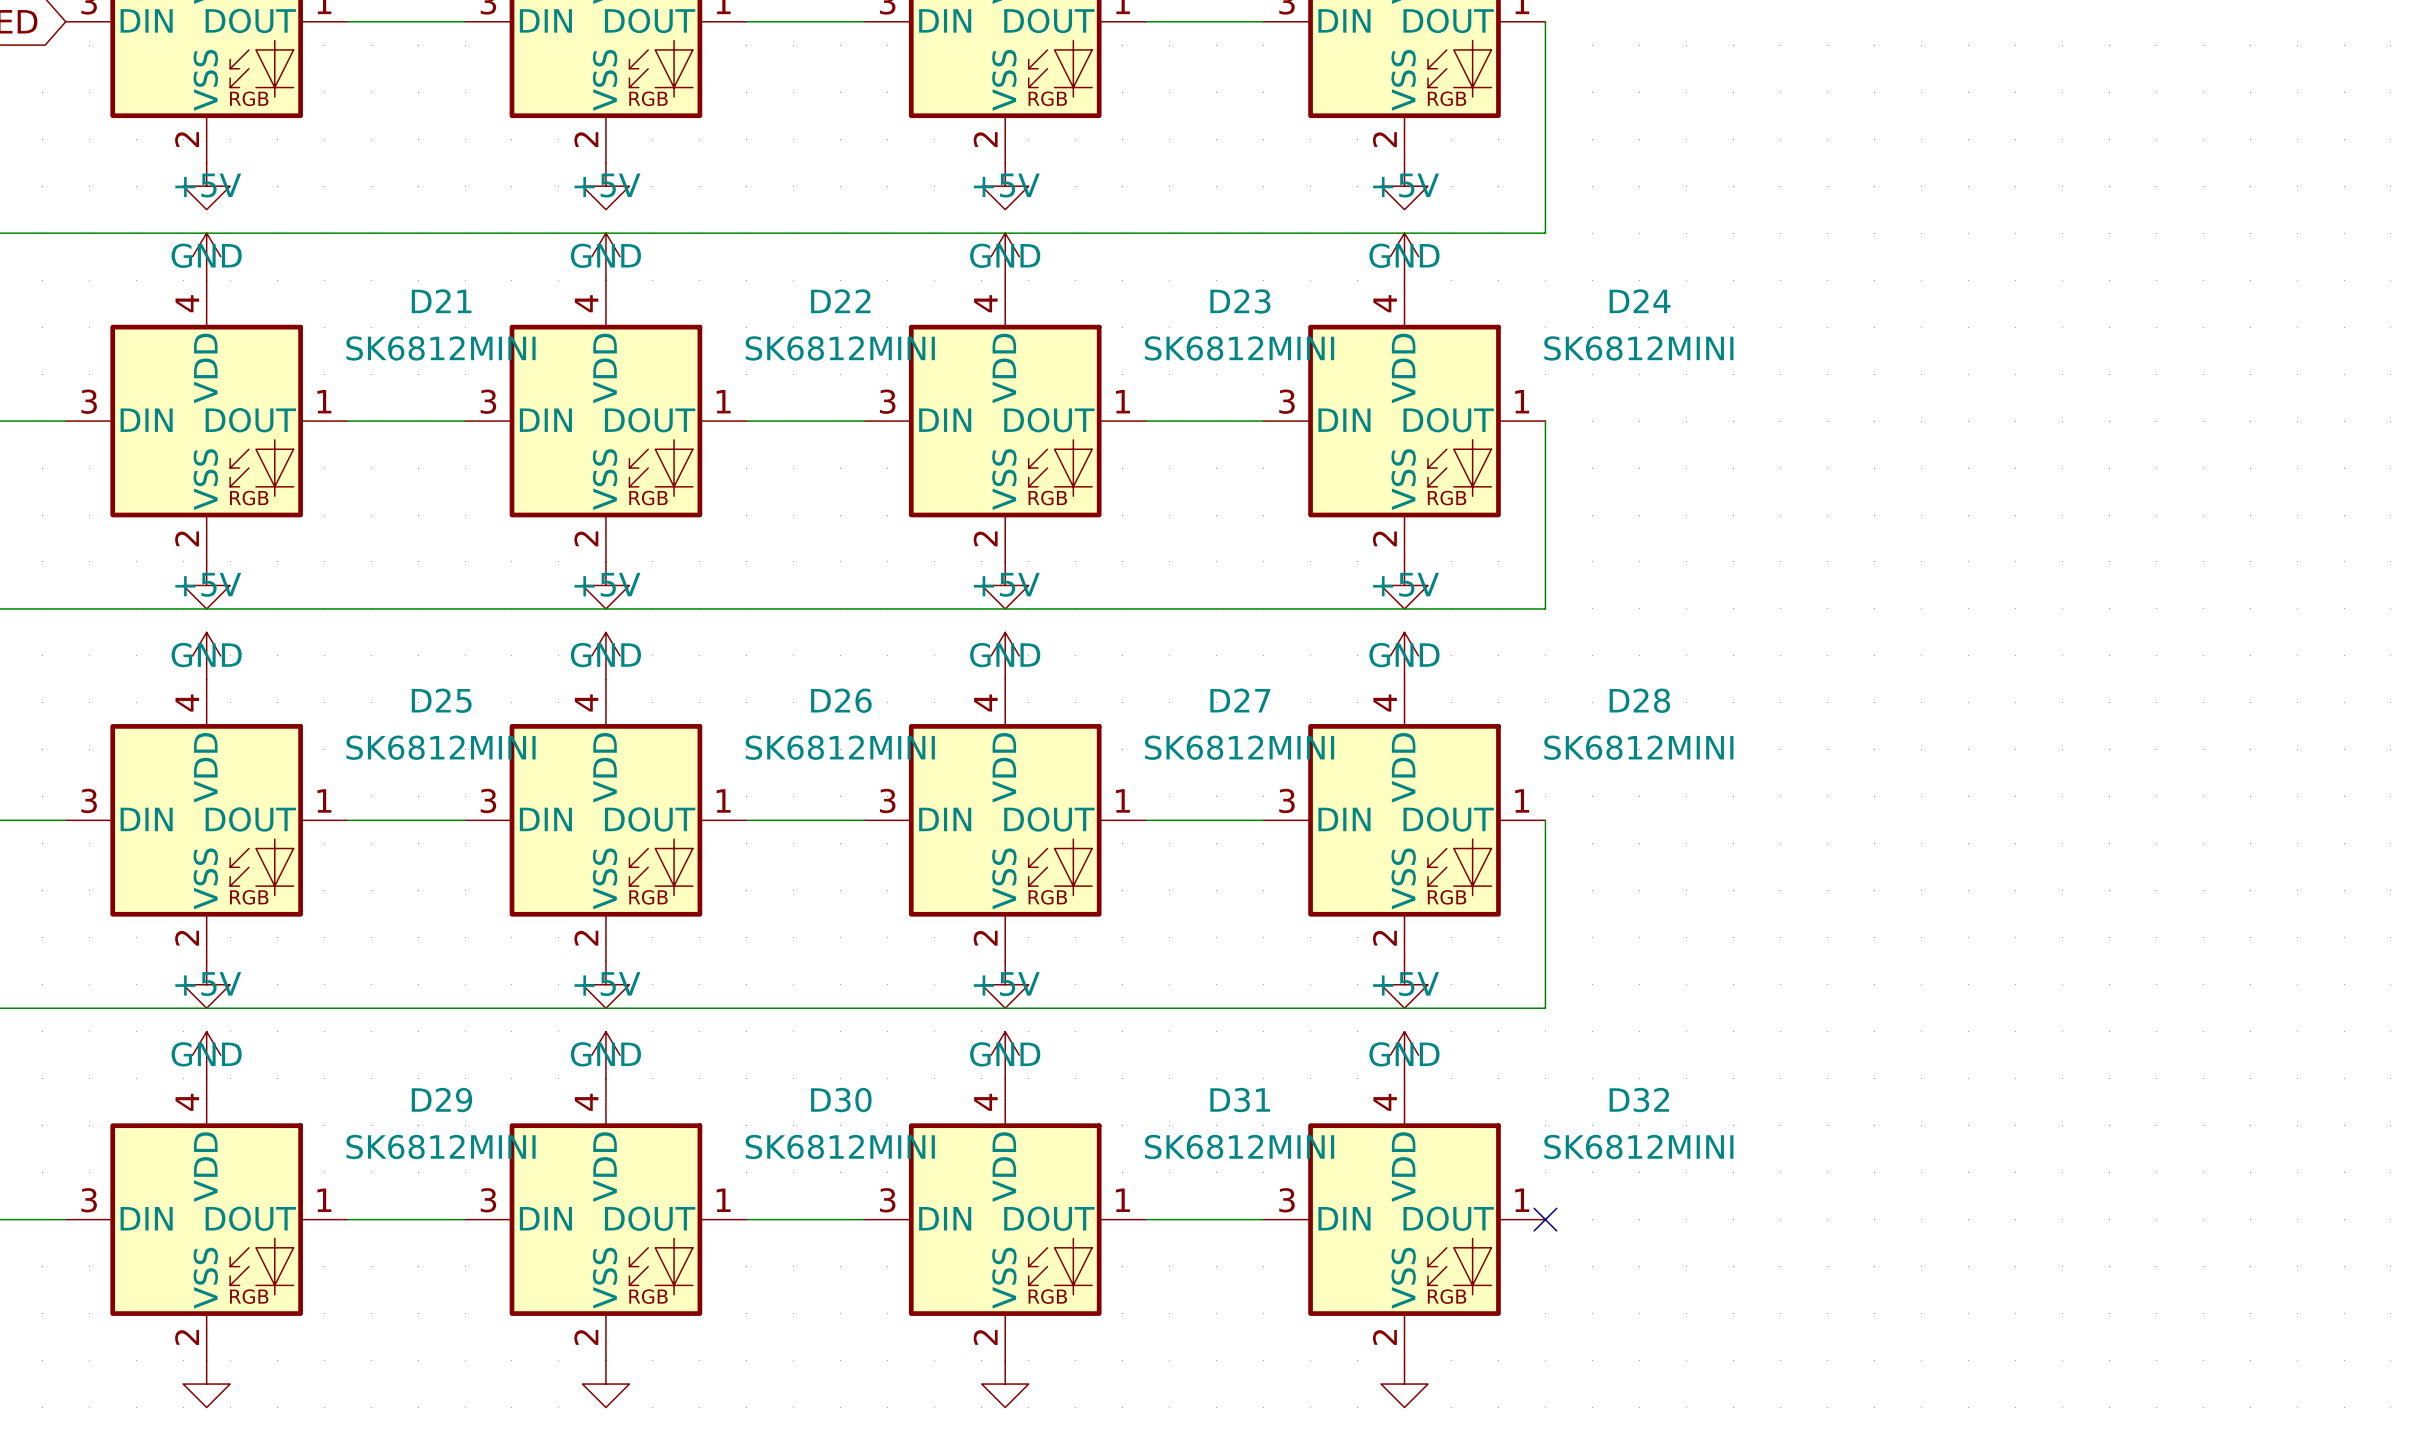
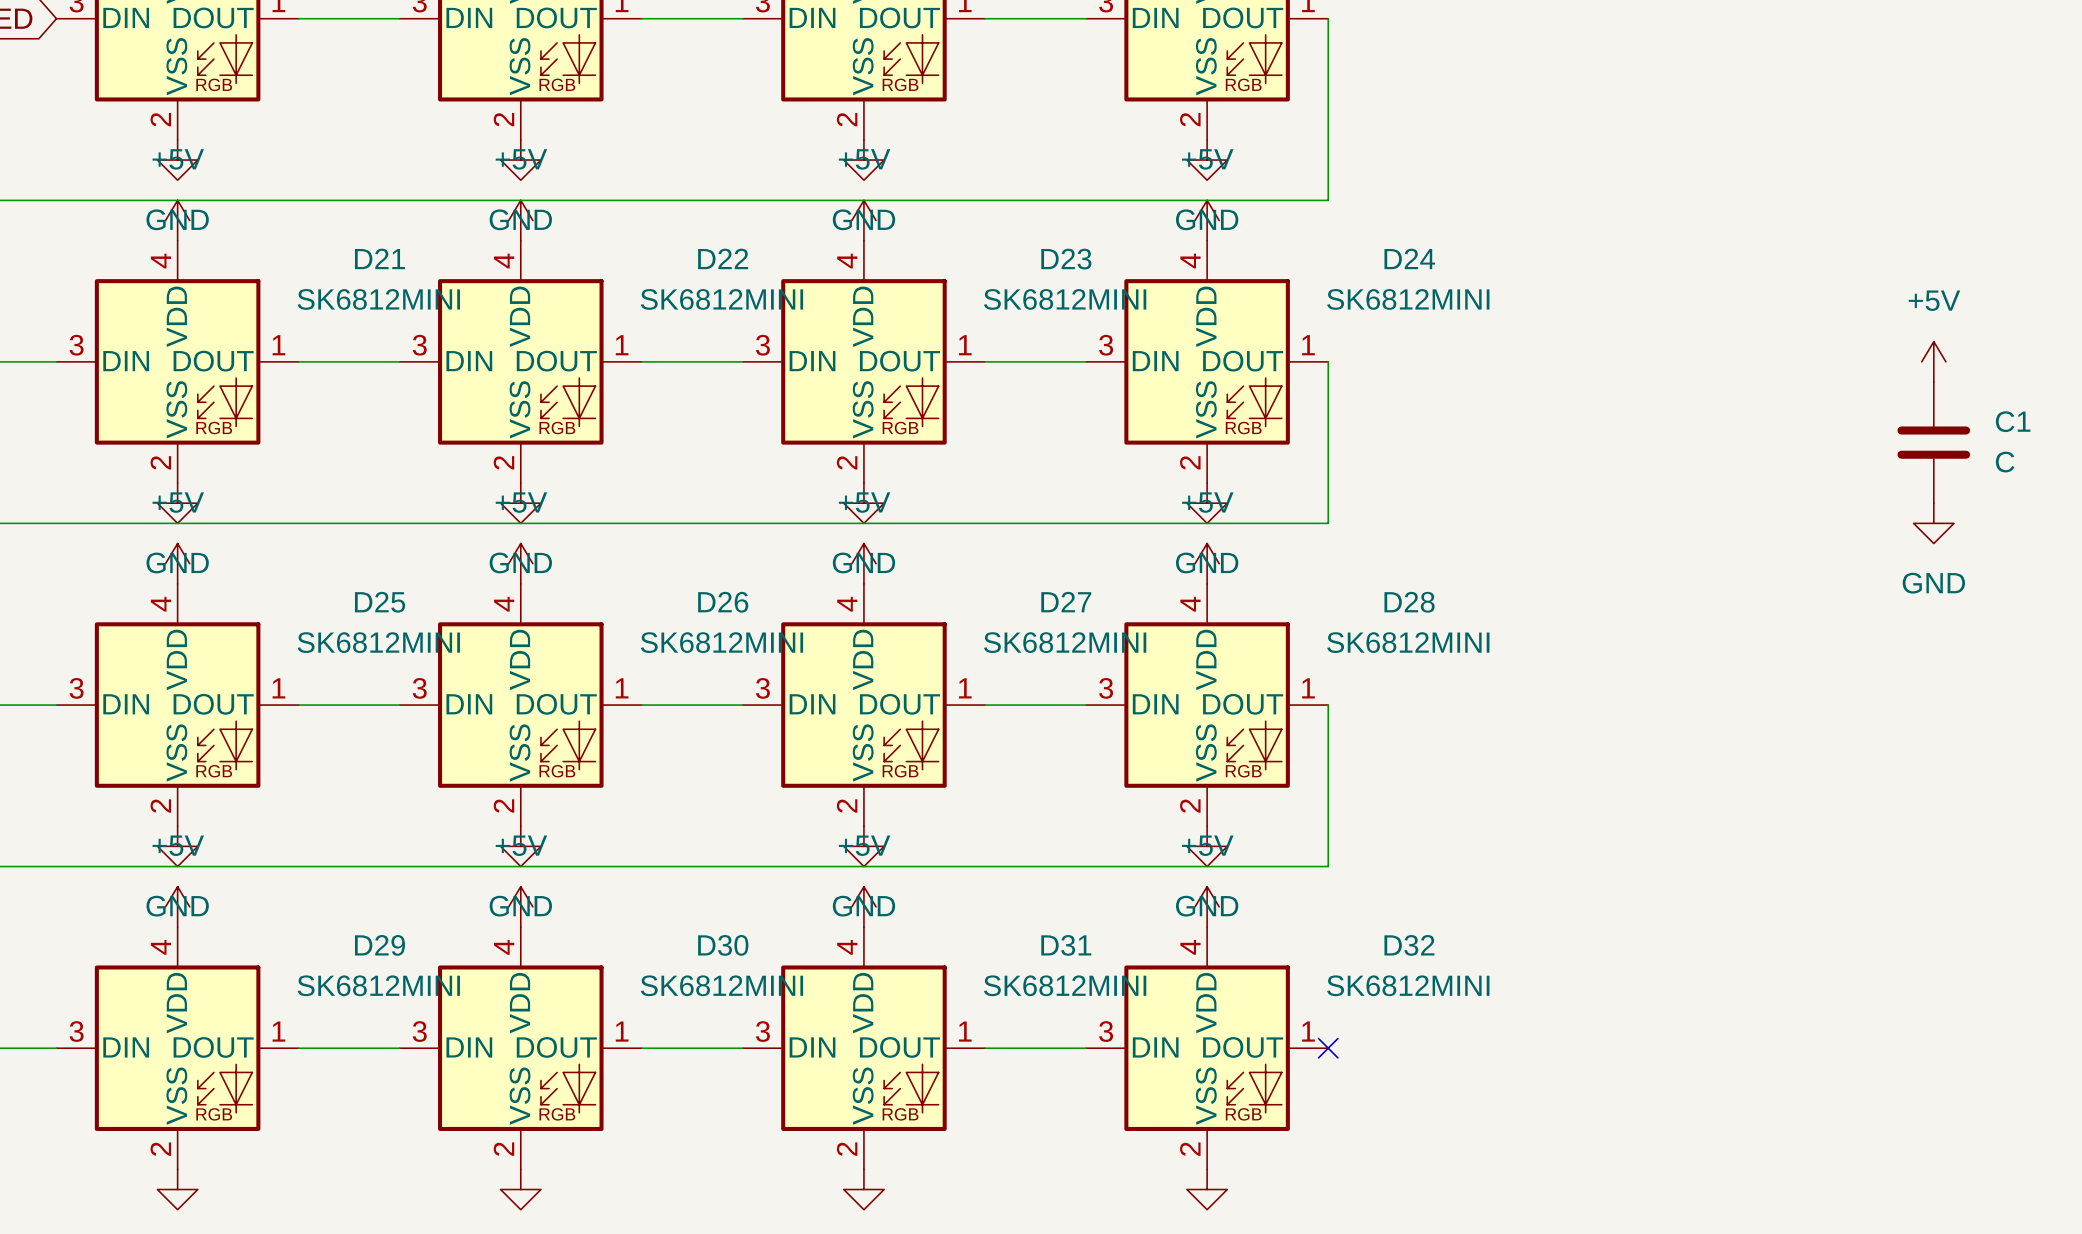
power symbol: none -> +5V (1933, 361)
C1: none -> C (1933, 442)
power symbol: none -> GND (1933, 523)

